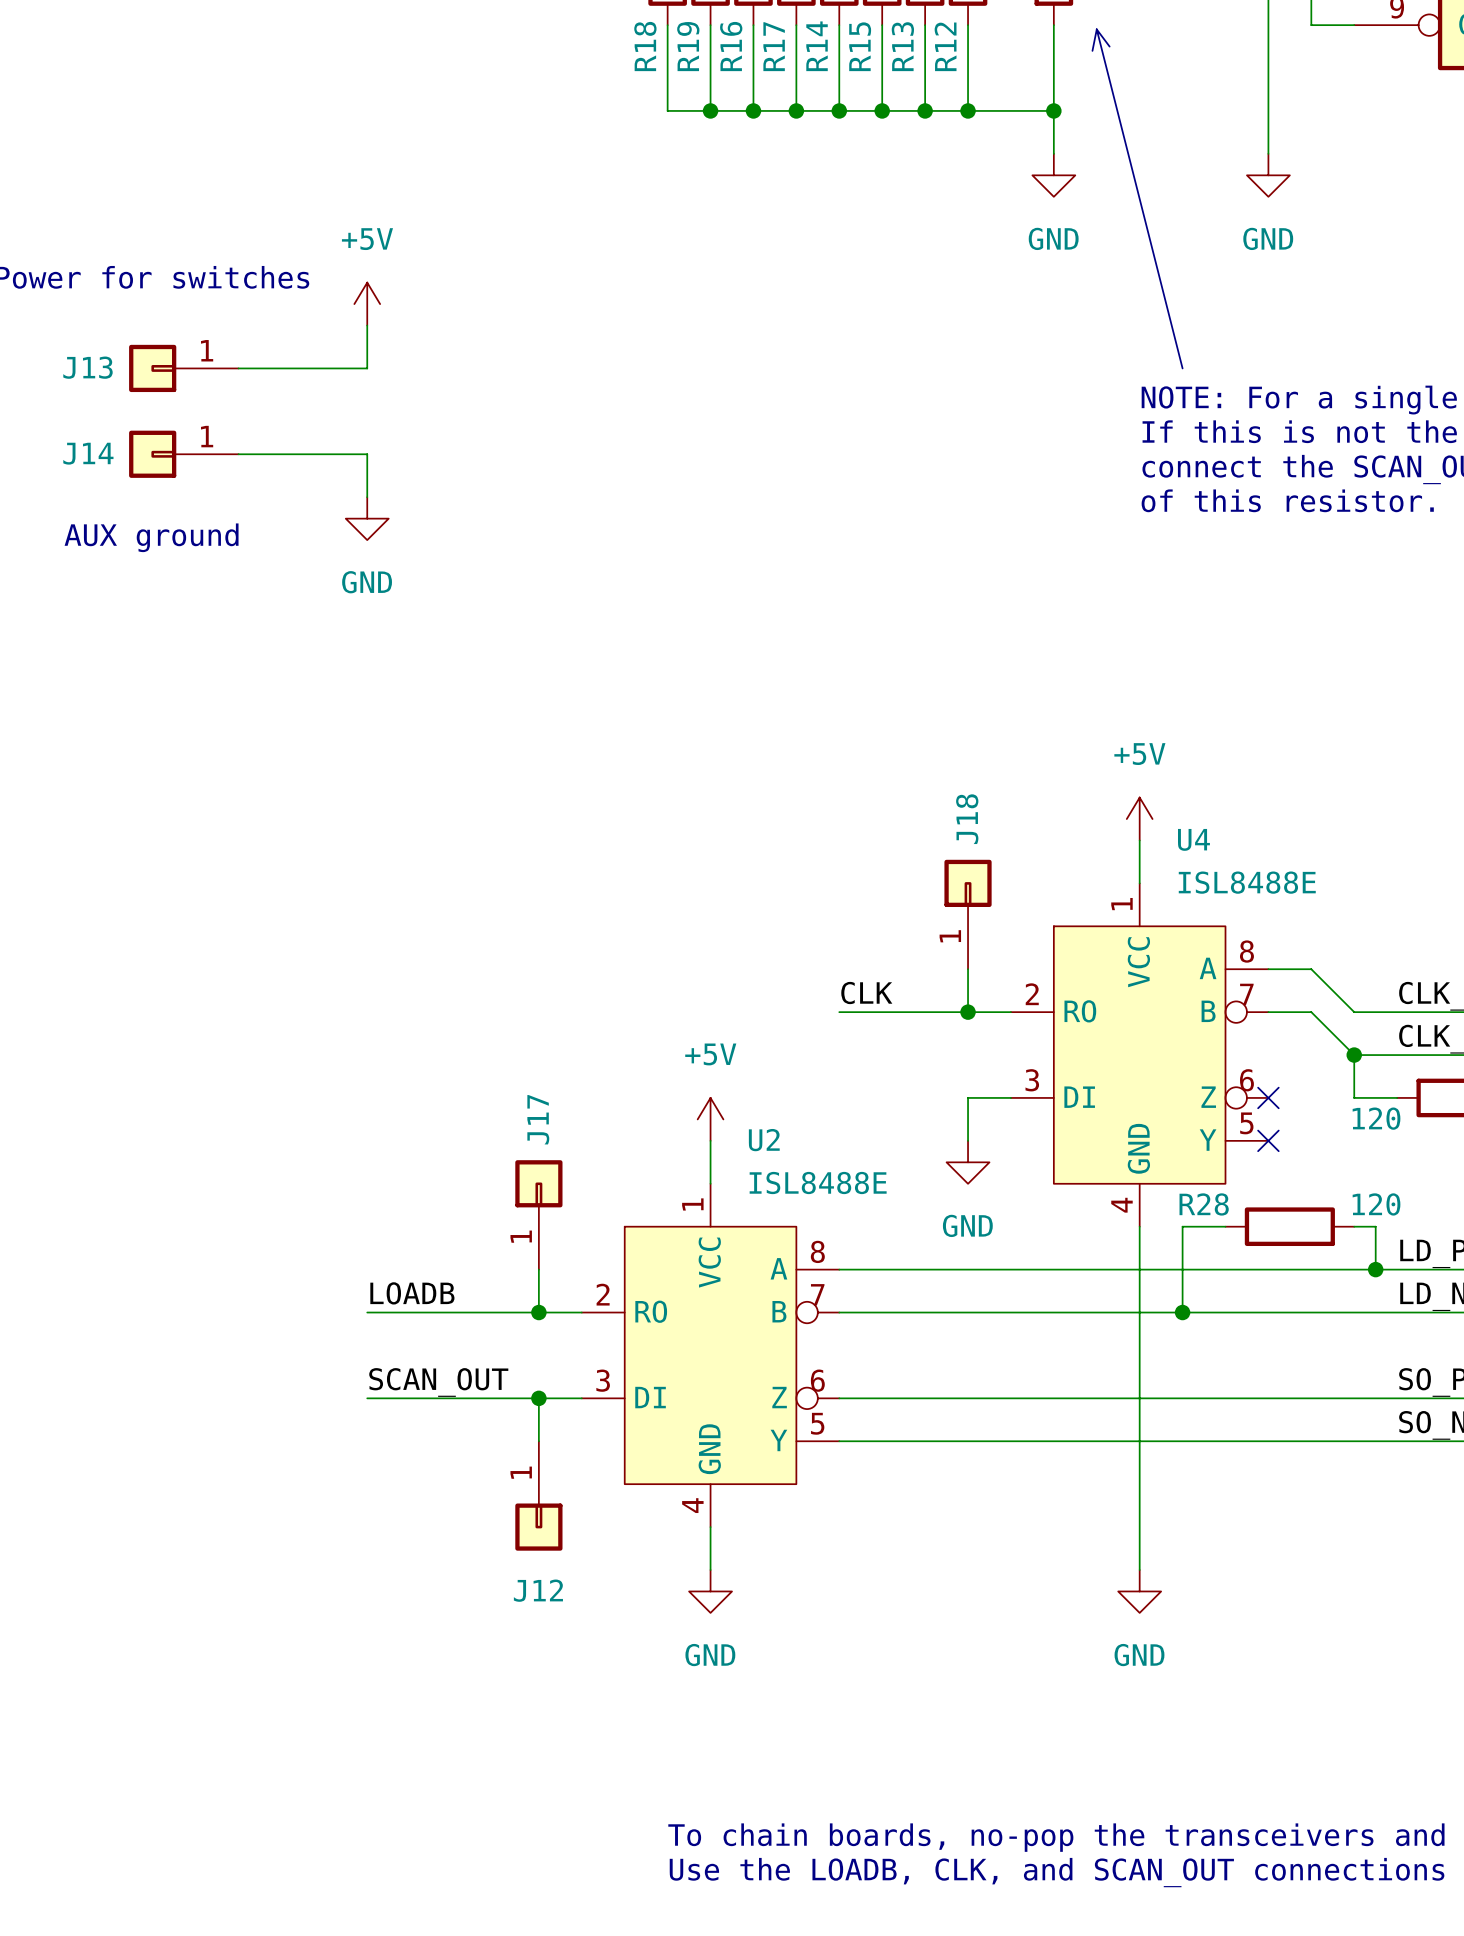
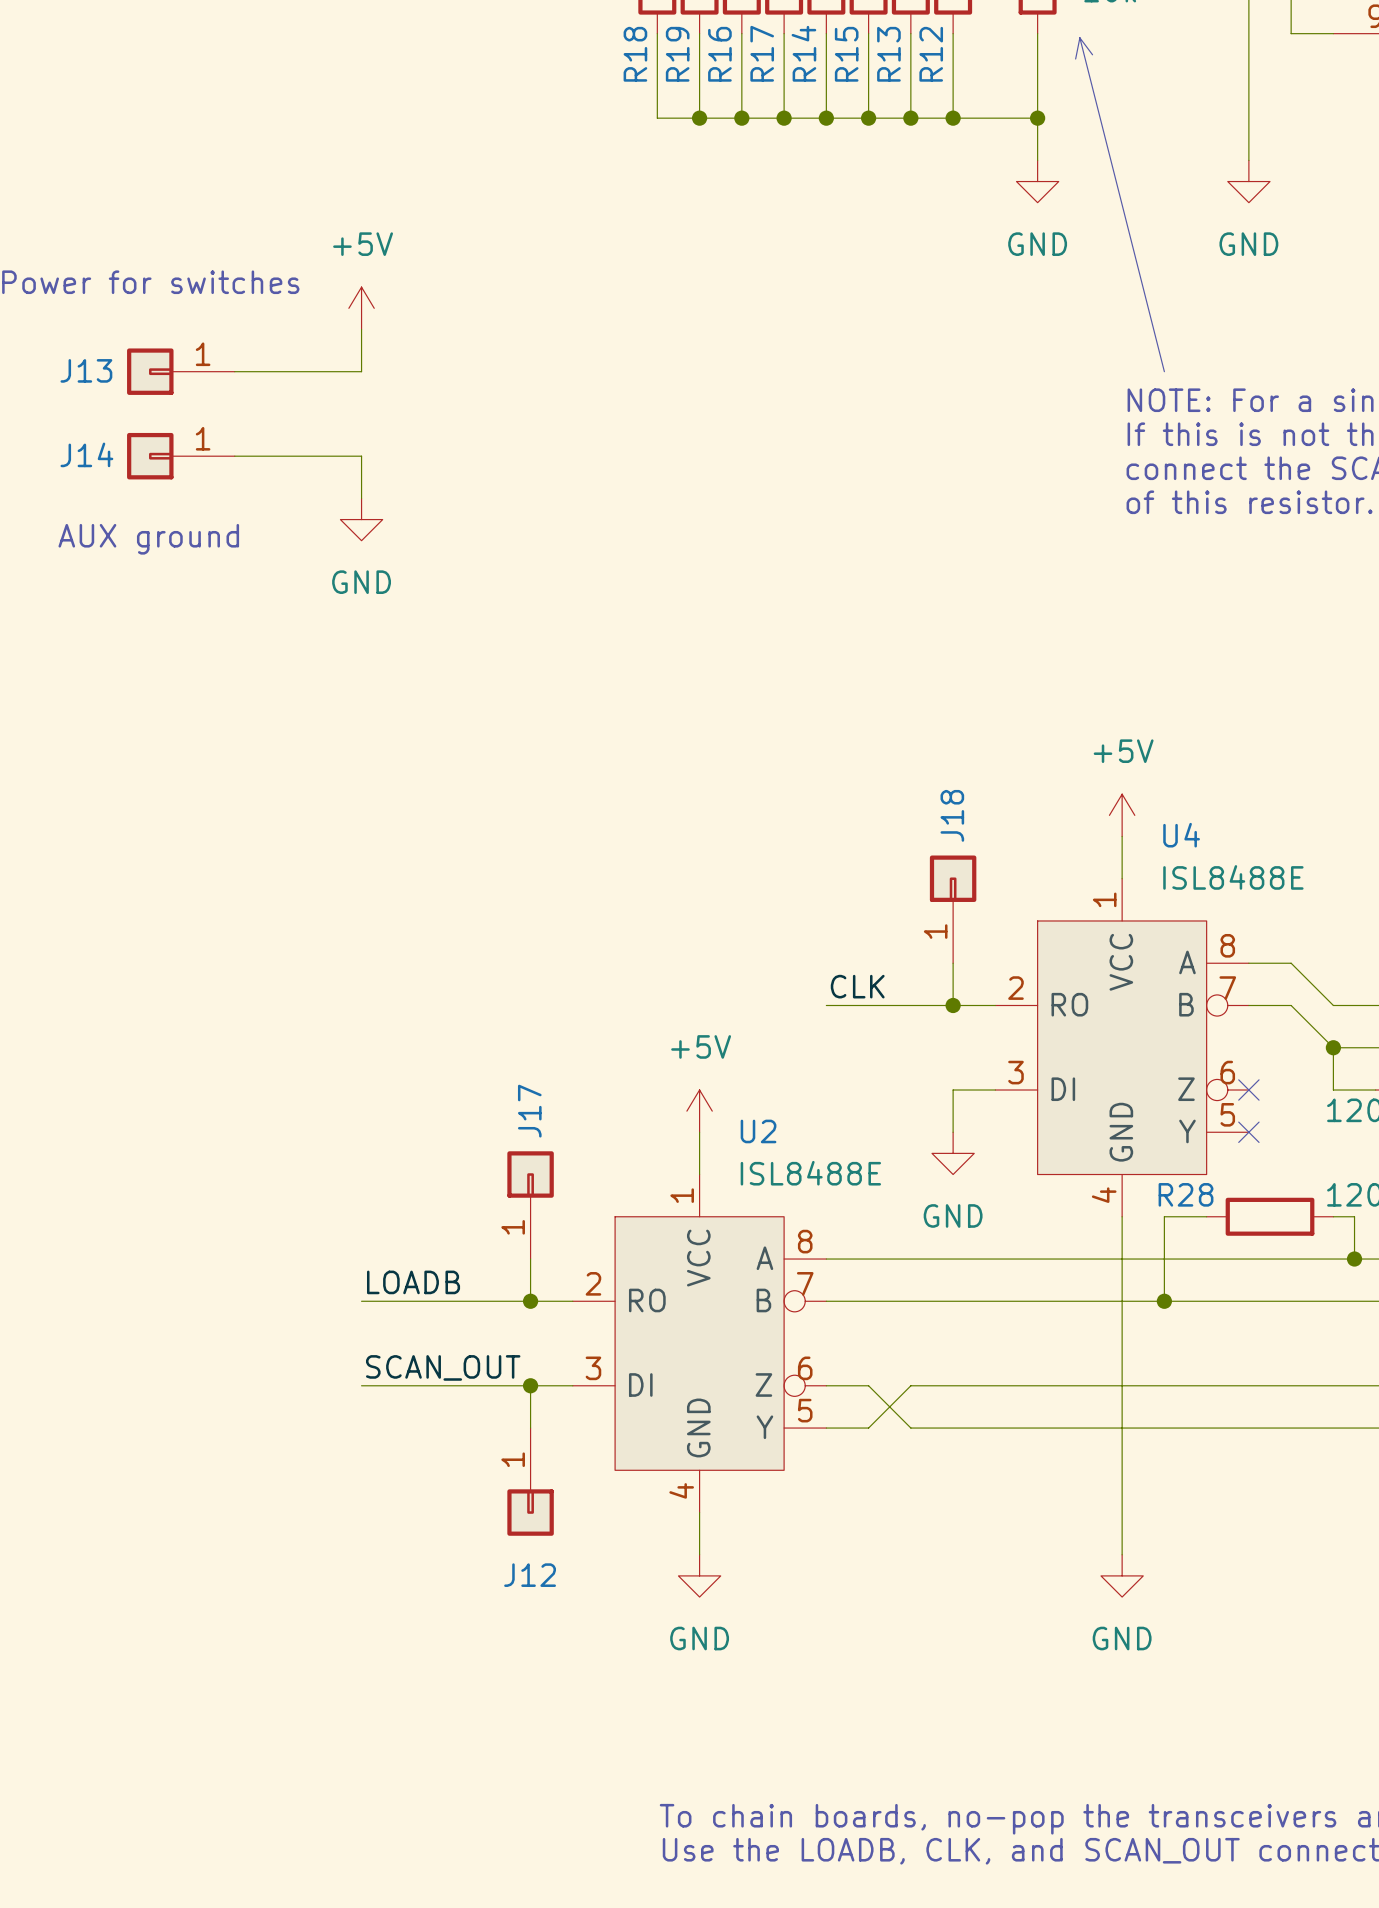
wire: (882, 1398) (925, 1398) -> (868, 1385) (910, 1428)
wire: (882, 1441) (925, 1441) -> (868, 1428) (910, 1385)

